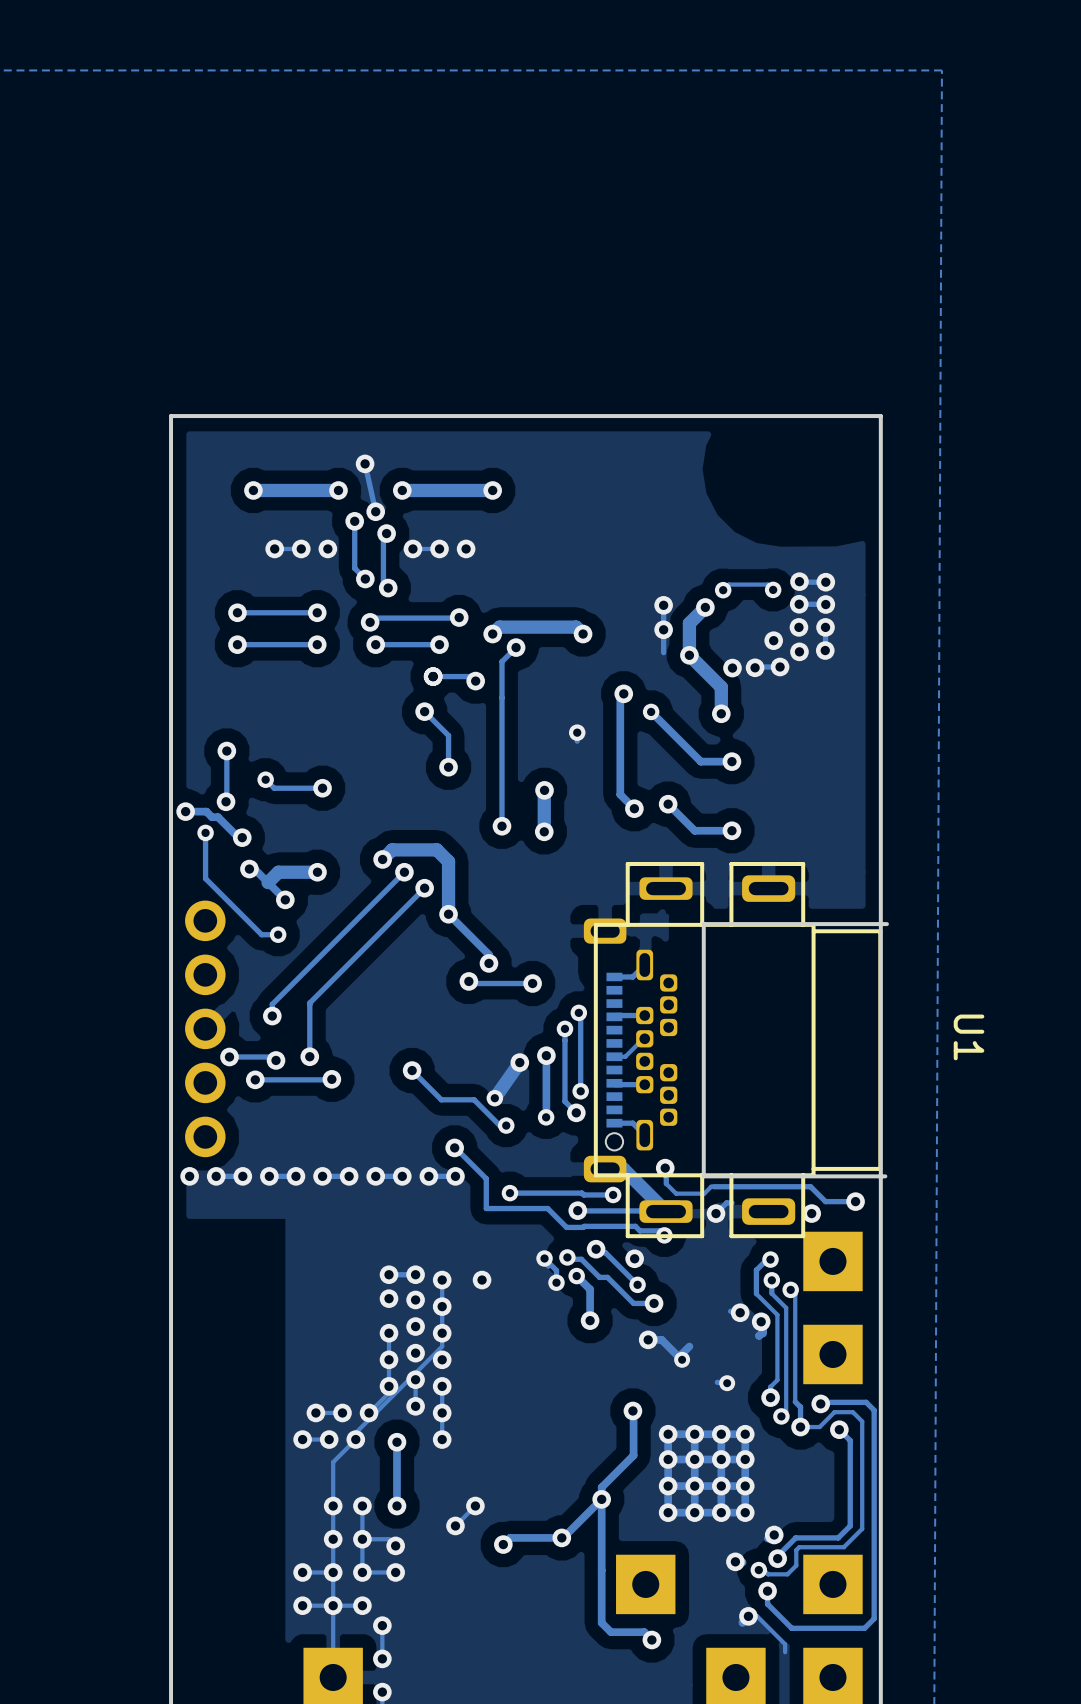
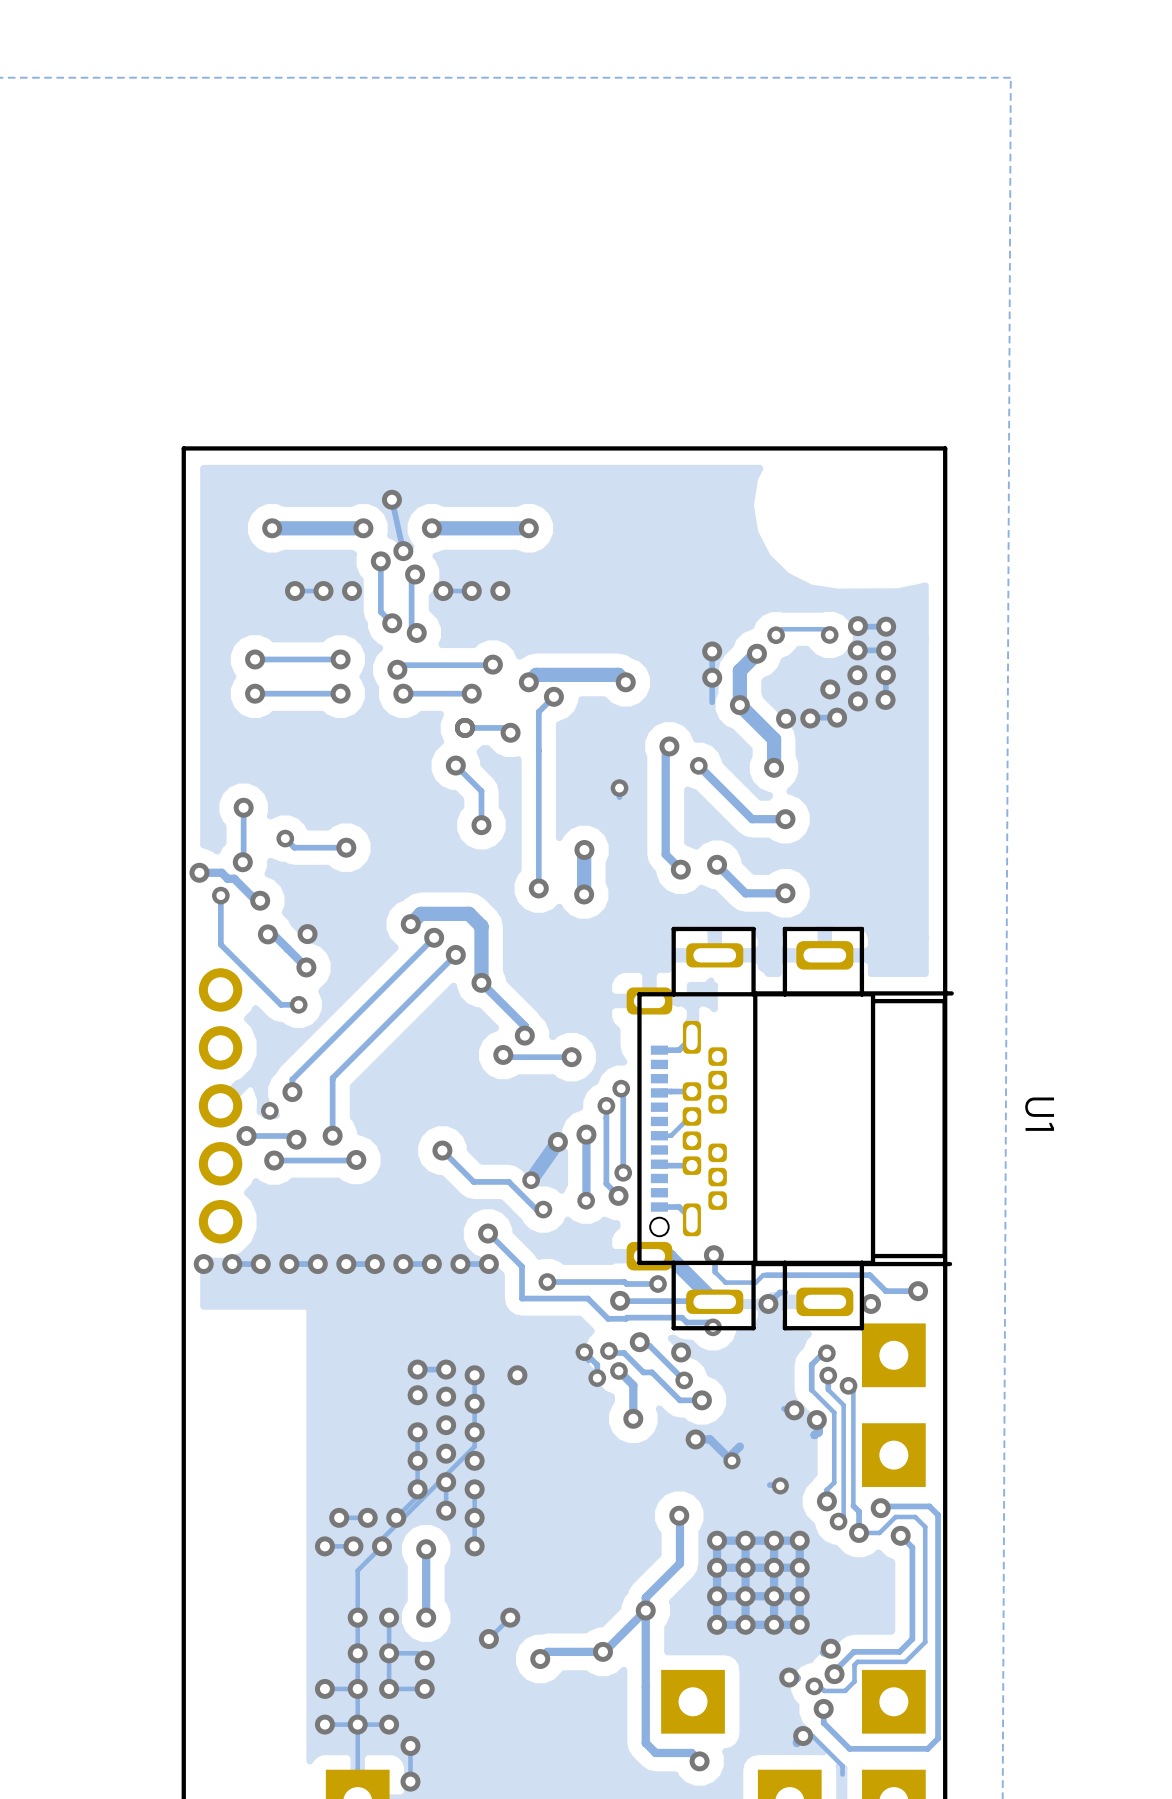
track: (317, 872) (278, 872) (268, 882) -> none
via position: (317, 872) -> (307, 934)
via: none -> (269, 1110)

